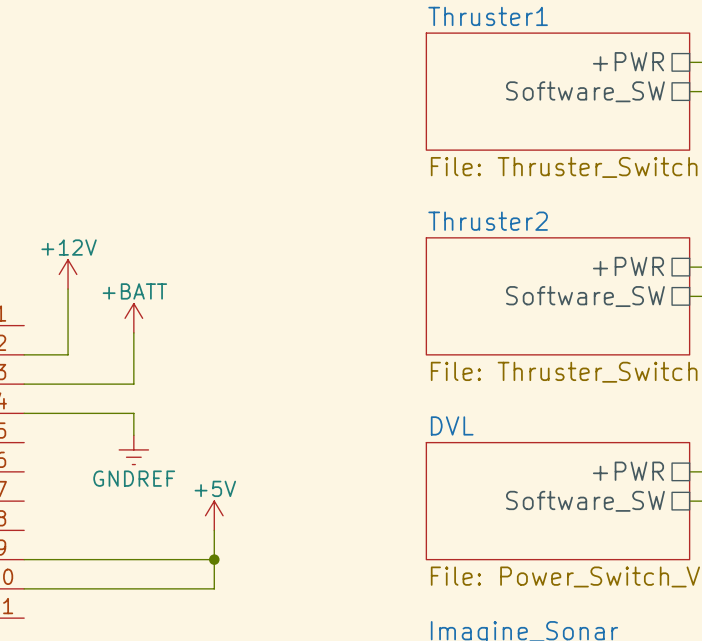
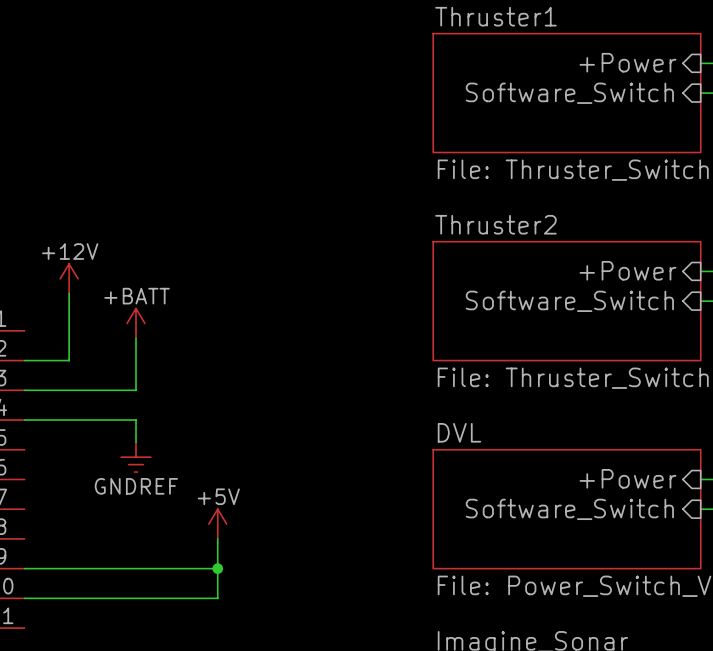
sheet pin shape: passive (628, 61) -> input (628, 62)
sheet pin: +PWR (628, 61) -> +Power (628, 62)
sheet pin shape: passive (585, 91) -> input (569, 93)
sheet pin: Software_SW (585, 91) -> Software_Switch (569, 93)
sheet pin shape: passive (628, 266) -> input (628, 270)
sheet pin: +PWR (628, 266) -> +Power (628, 270)
sheet pin shape: passive (585, 296) -> input (569, 301)
sheet pin: Software_SW (585, 296) -> Software_Switch (569, 301)
sheet pin shape: passive (628, 471) -> input (628, 478)
sheet pin: +PWR (628, 471) -> +Power (628, 478)
sheet pin shape: passive (585, 501) -> input (569, 509)
sheet pin: Software_SW (585, 501) -> Software_Switch (569, 509)

